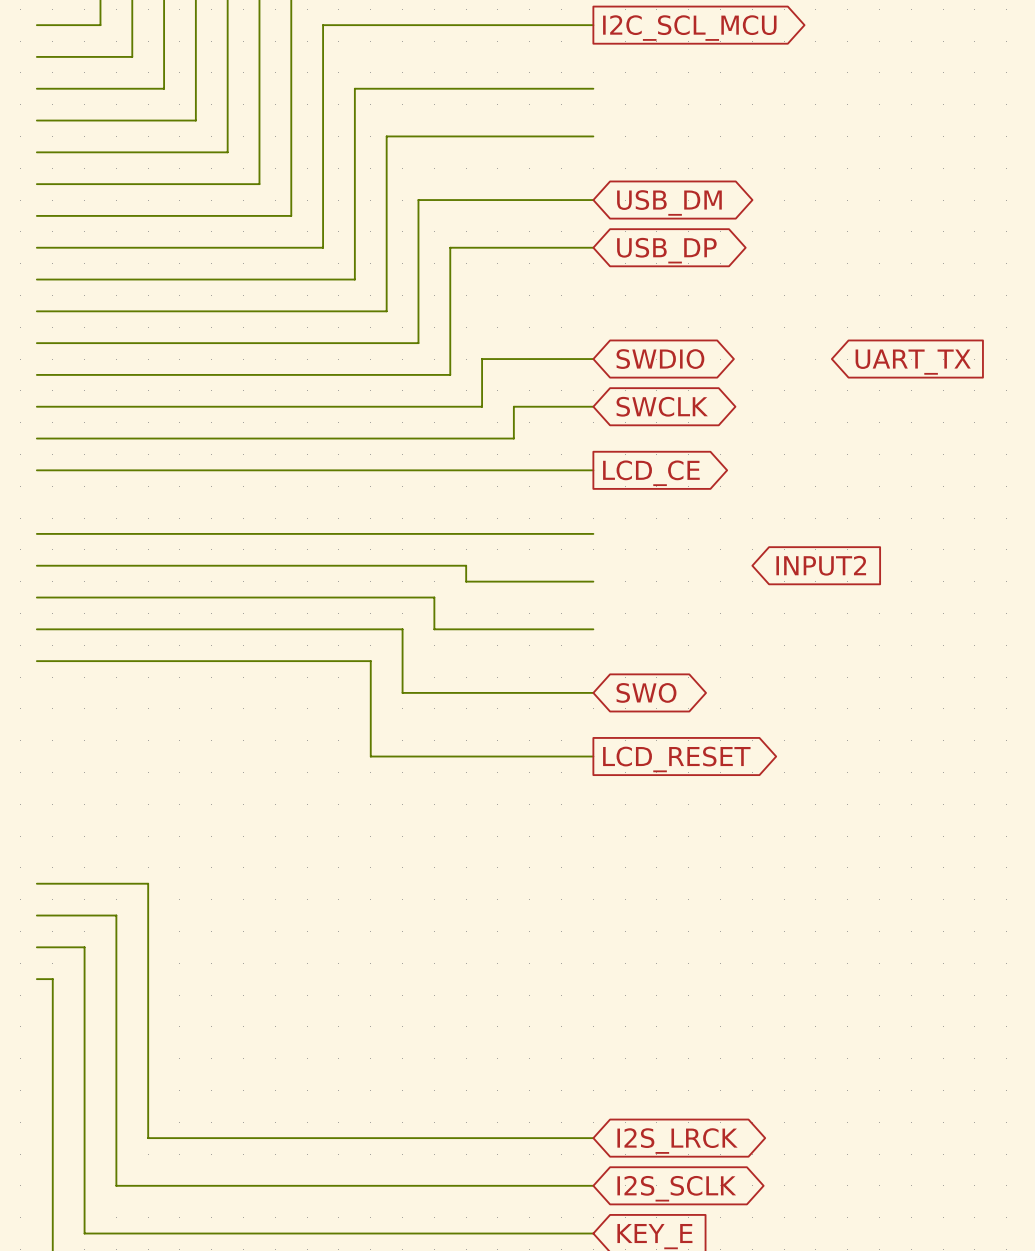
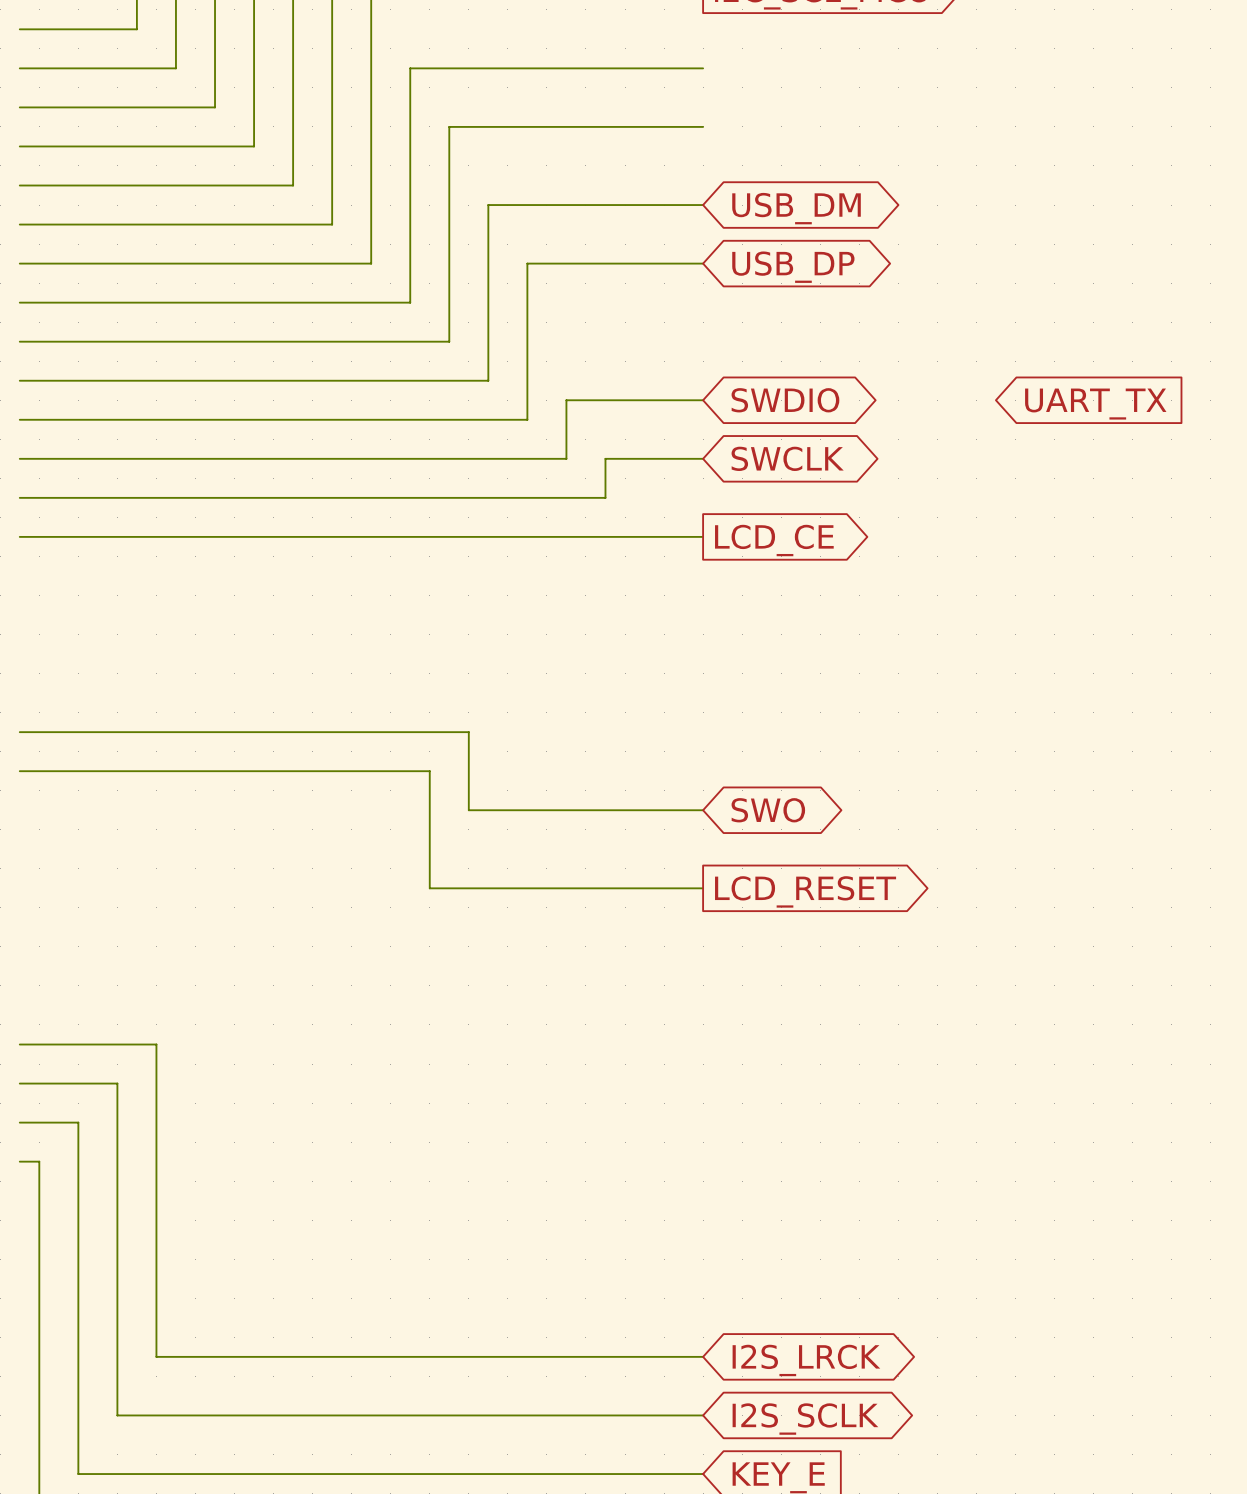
wire: (36, 533) (593, 533) -> none
wire: (36, 565) (466, 565) (466, 581) (593, 581) -> none
global label: INPUT2 (821, 565) -> none
wire: (36, 597) (434, 597) (434, 629) (593, 629) -> none

